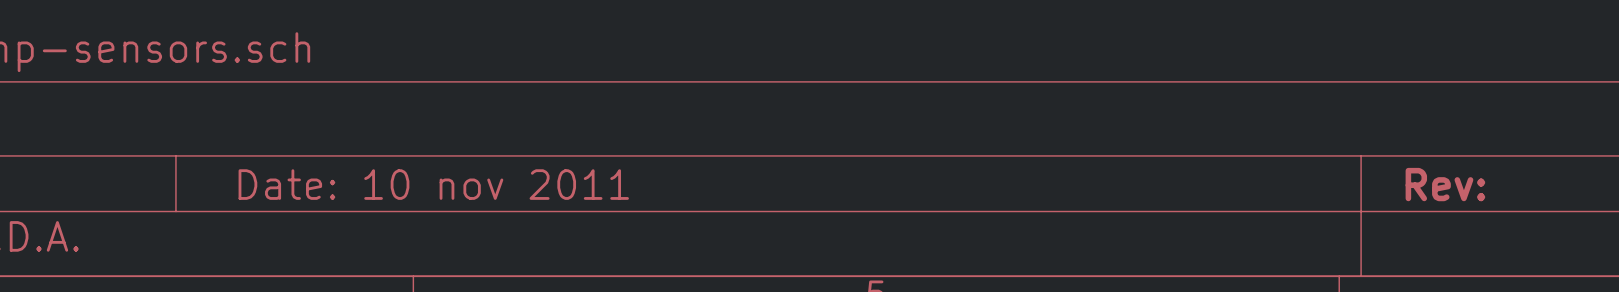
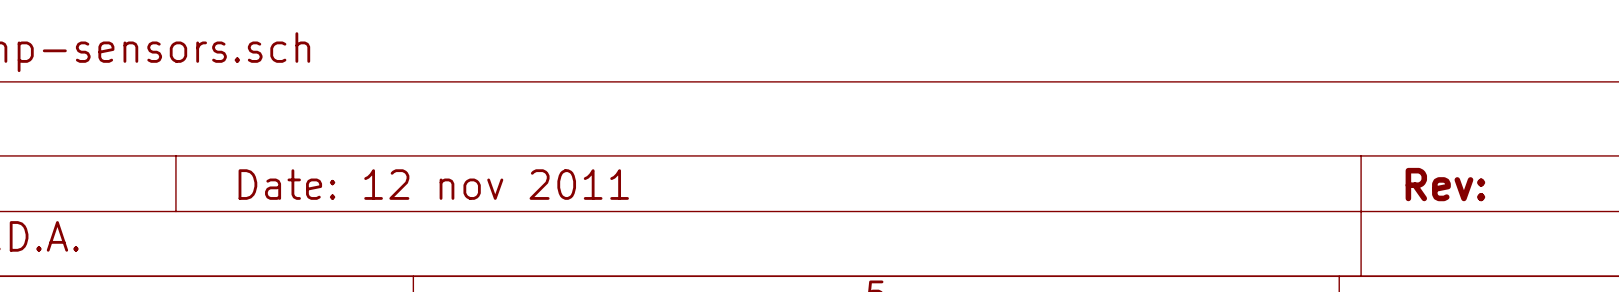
title block: Date: 10 nov 2011 (433, 184) -> Date: 12 nov 2011 (433, 184)

